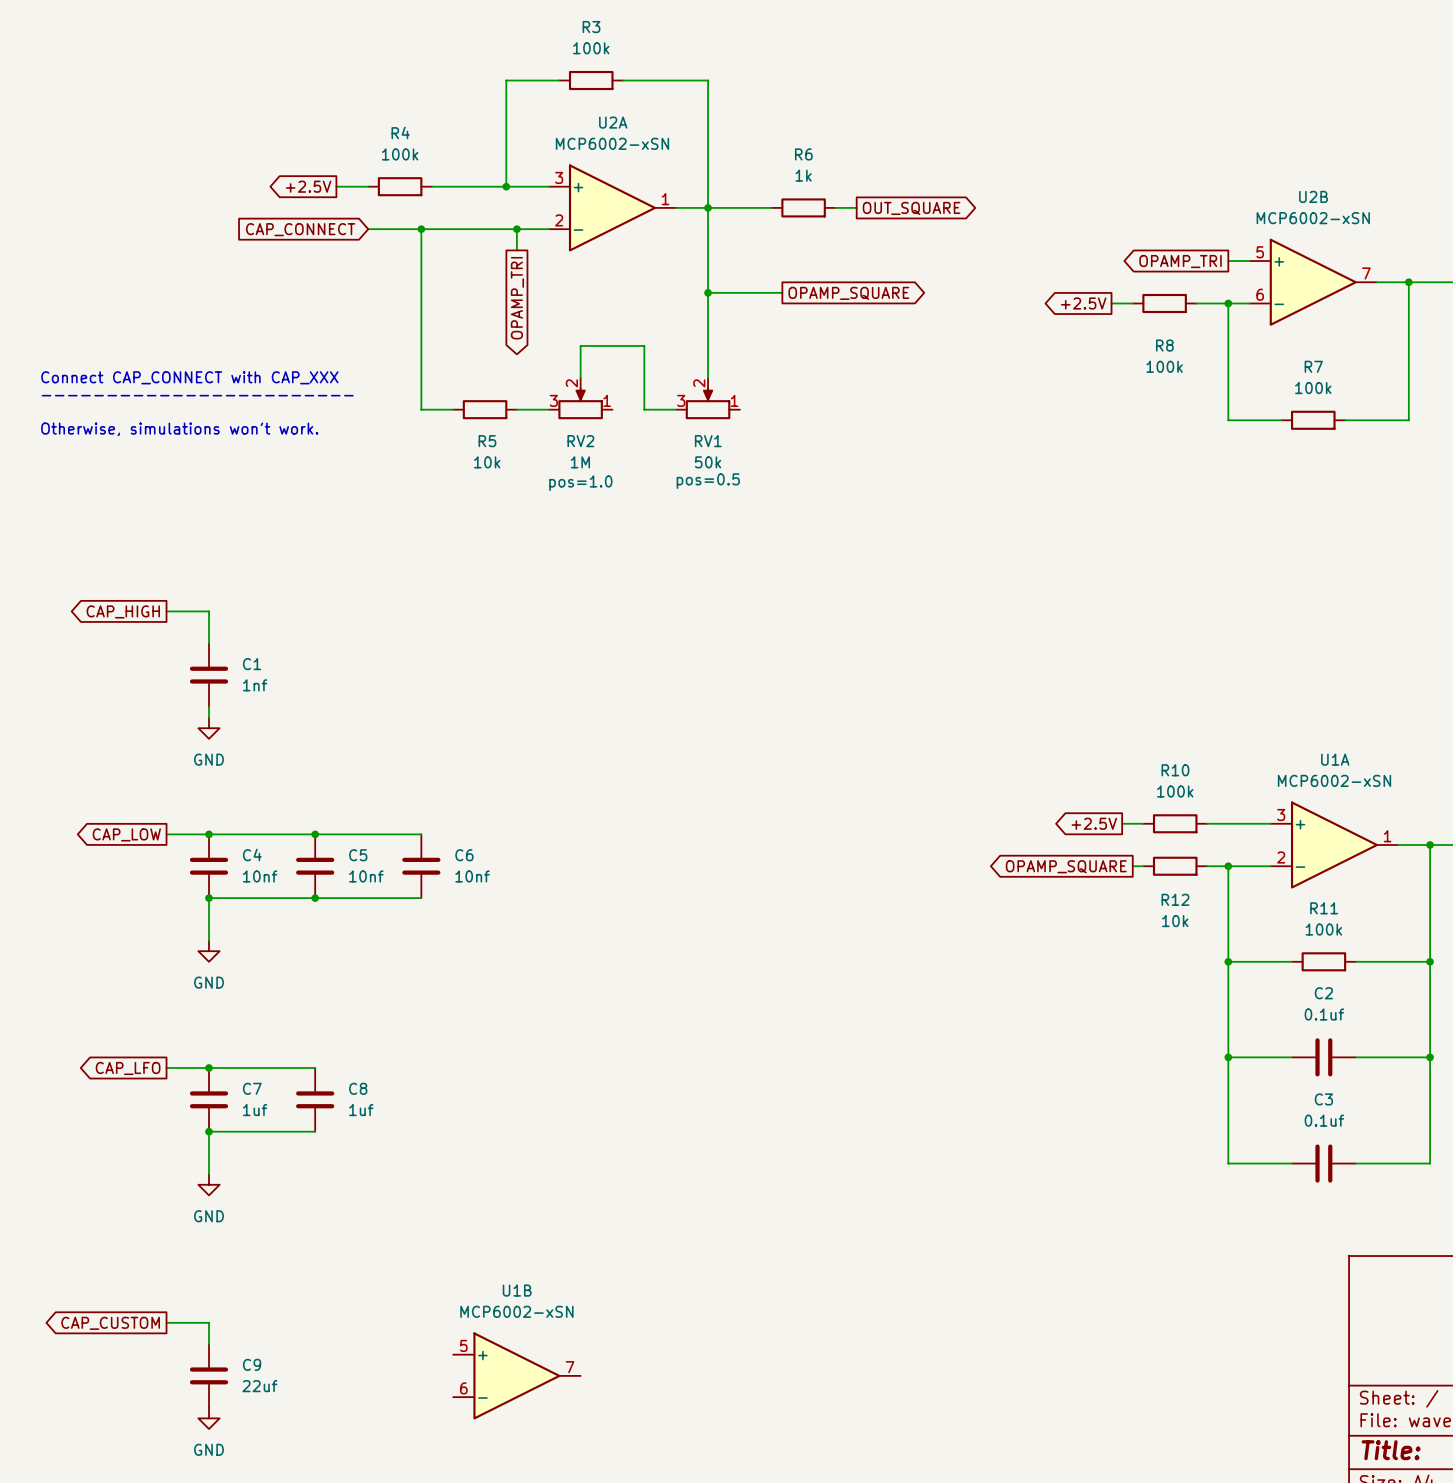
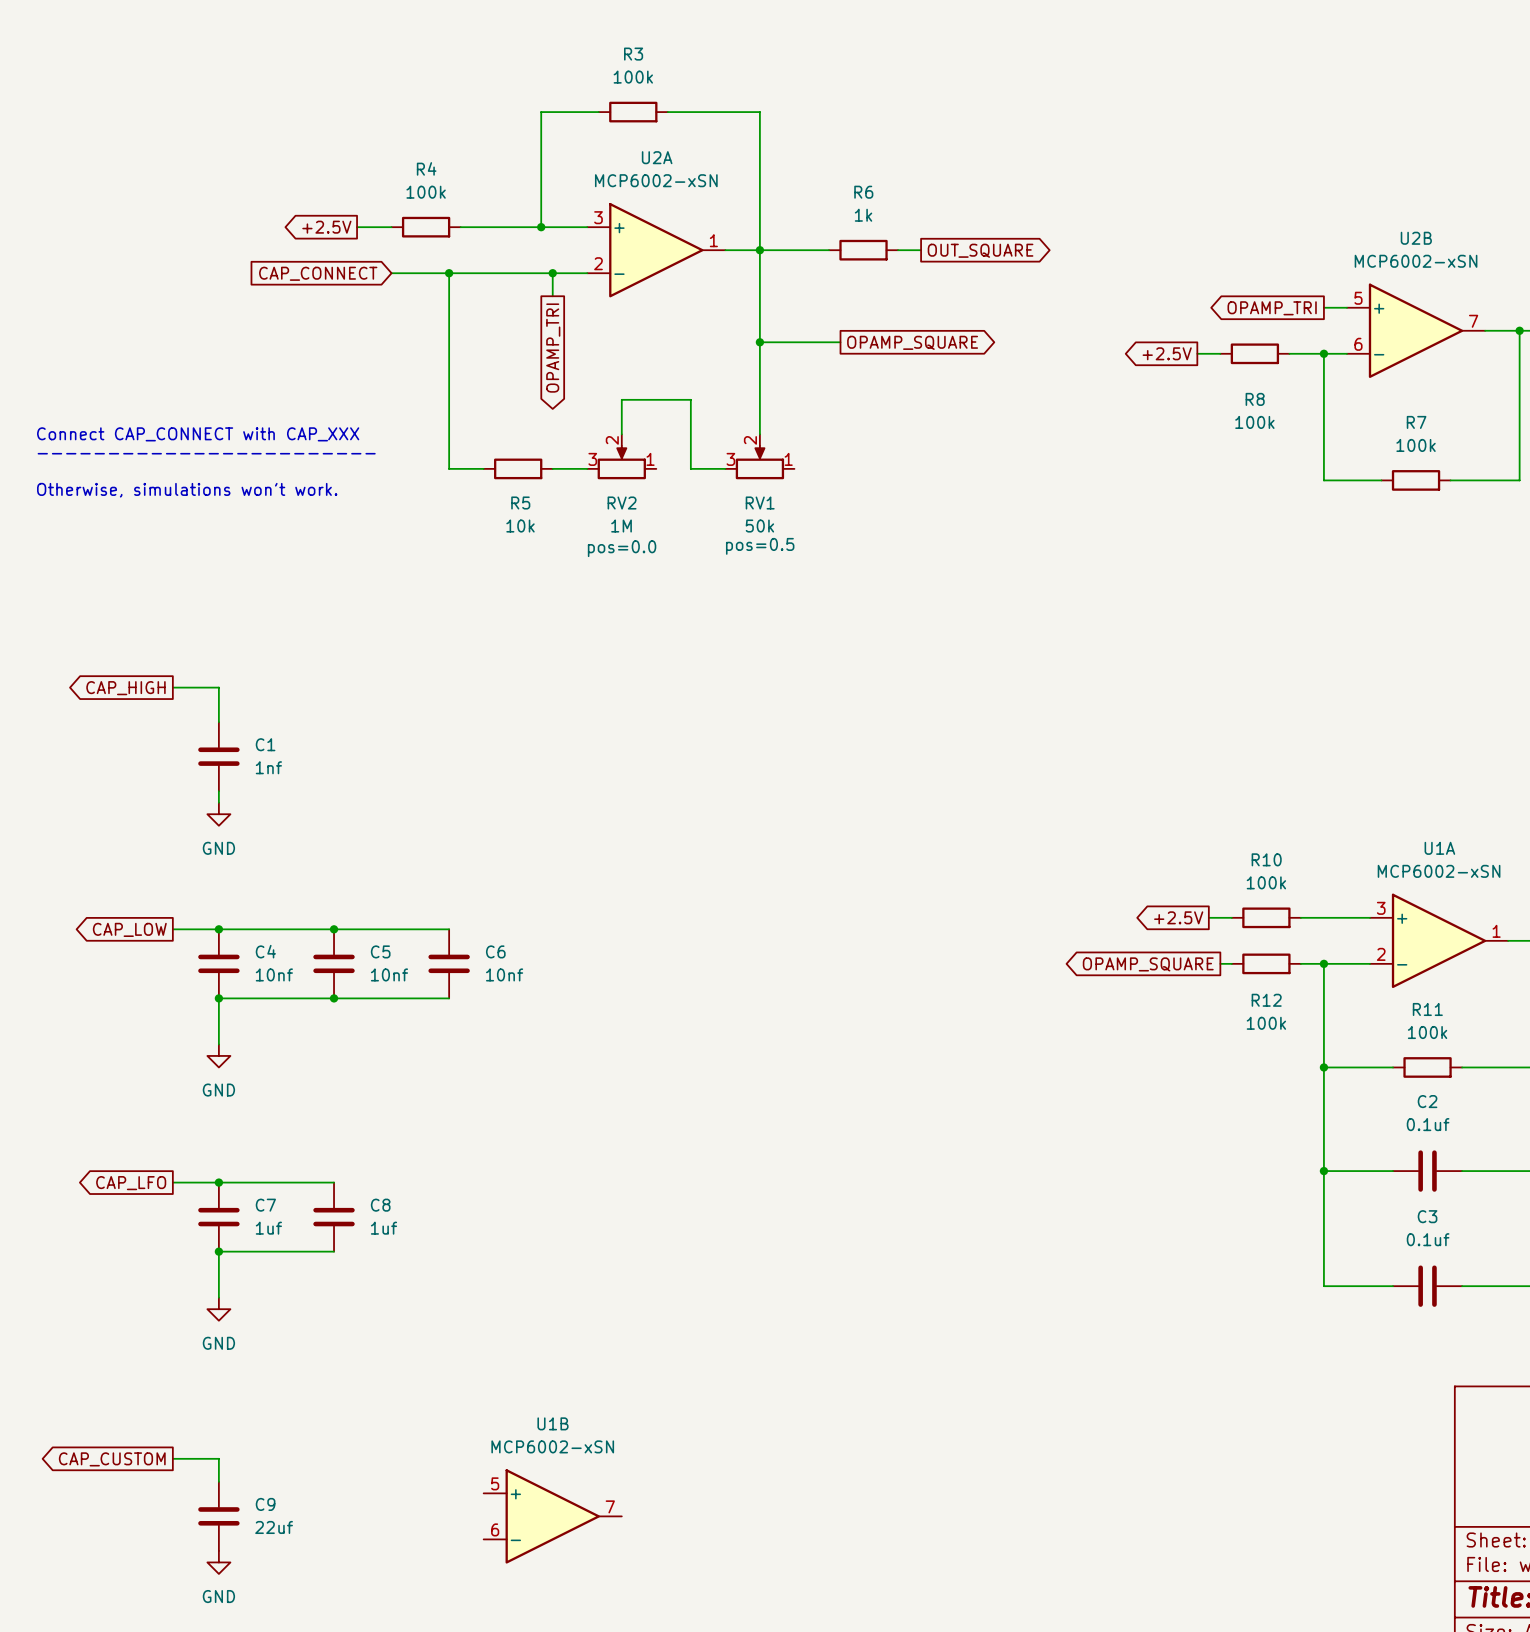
RV2 text: pos=1.0 (580, 483) -> pos=0.0 (622, 548)
R12 value: 10k (1175, 921) -> 100k (1266, 1023)

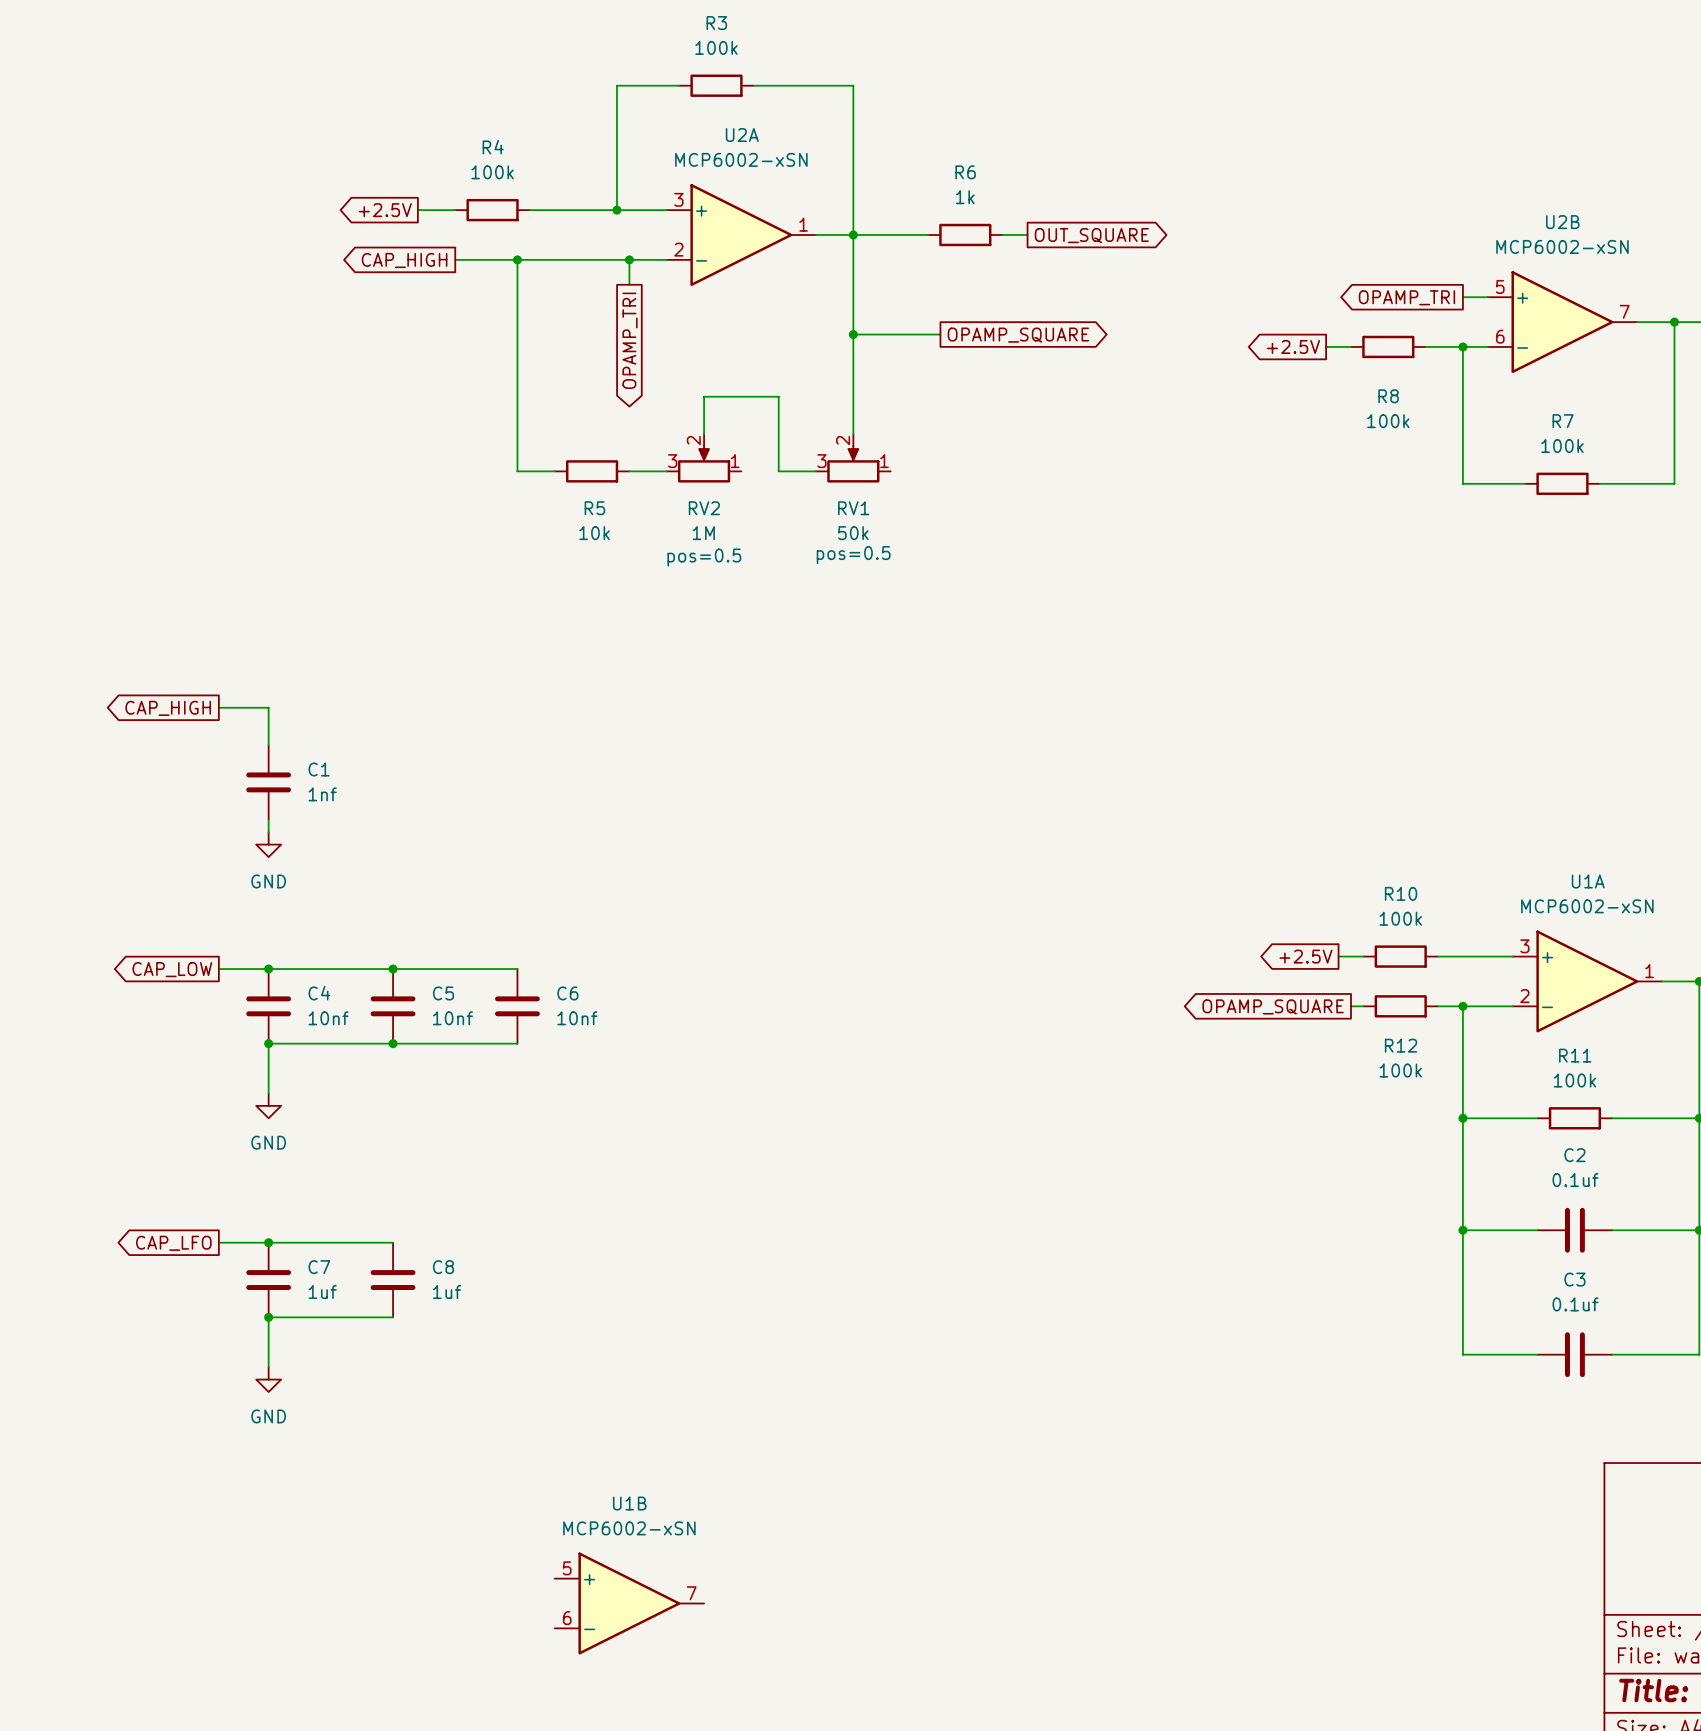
global label shape: input (318, 273) -> output (404, 260)
global label: CAP_CONNECT (318, 273) -> CAP_HIGH (404, 260)
text: Connect CAP_CONNECT with CAP_XXX (198, 434) -> none
text: ------------------------ (206, 453) -> none
text: Otherwise, simulations won't work. (187, 490) -> none
RV2 text: pos=0.0 (622, 548) -> pos=0.5 (704, 557)
wire: (172, 1458) (218, 1458) (218, 1481) -> none
global label: CAP_CUSTOM (112, 1459) -> none
C9: 22uf (218, 1516) -> none
power symbol: GND (218, 1562) -> none

